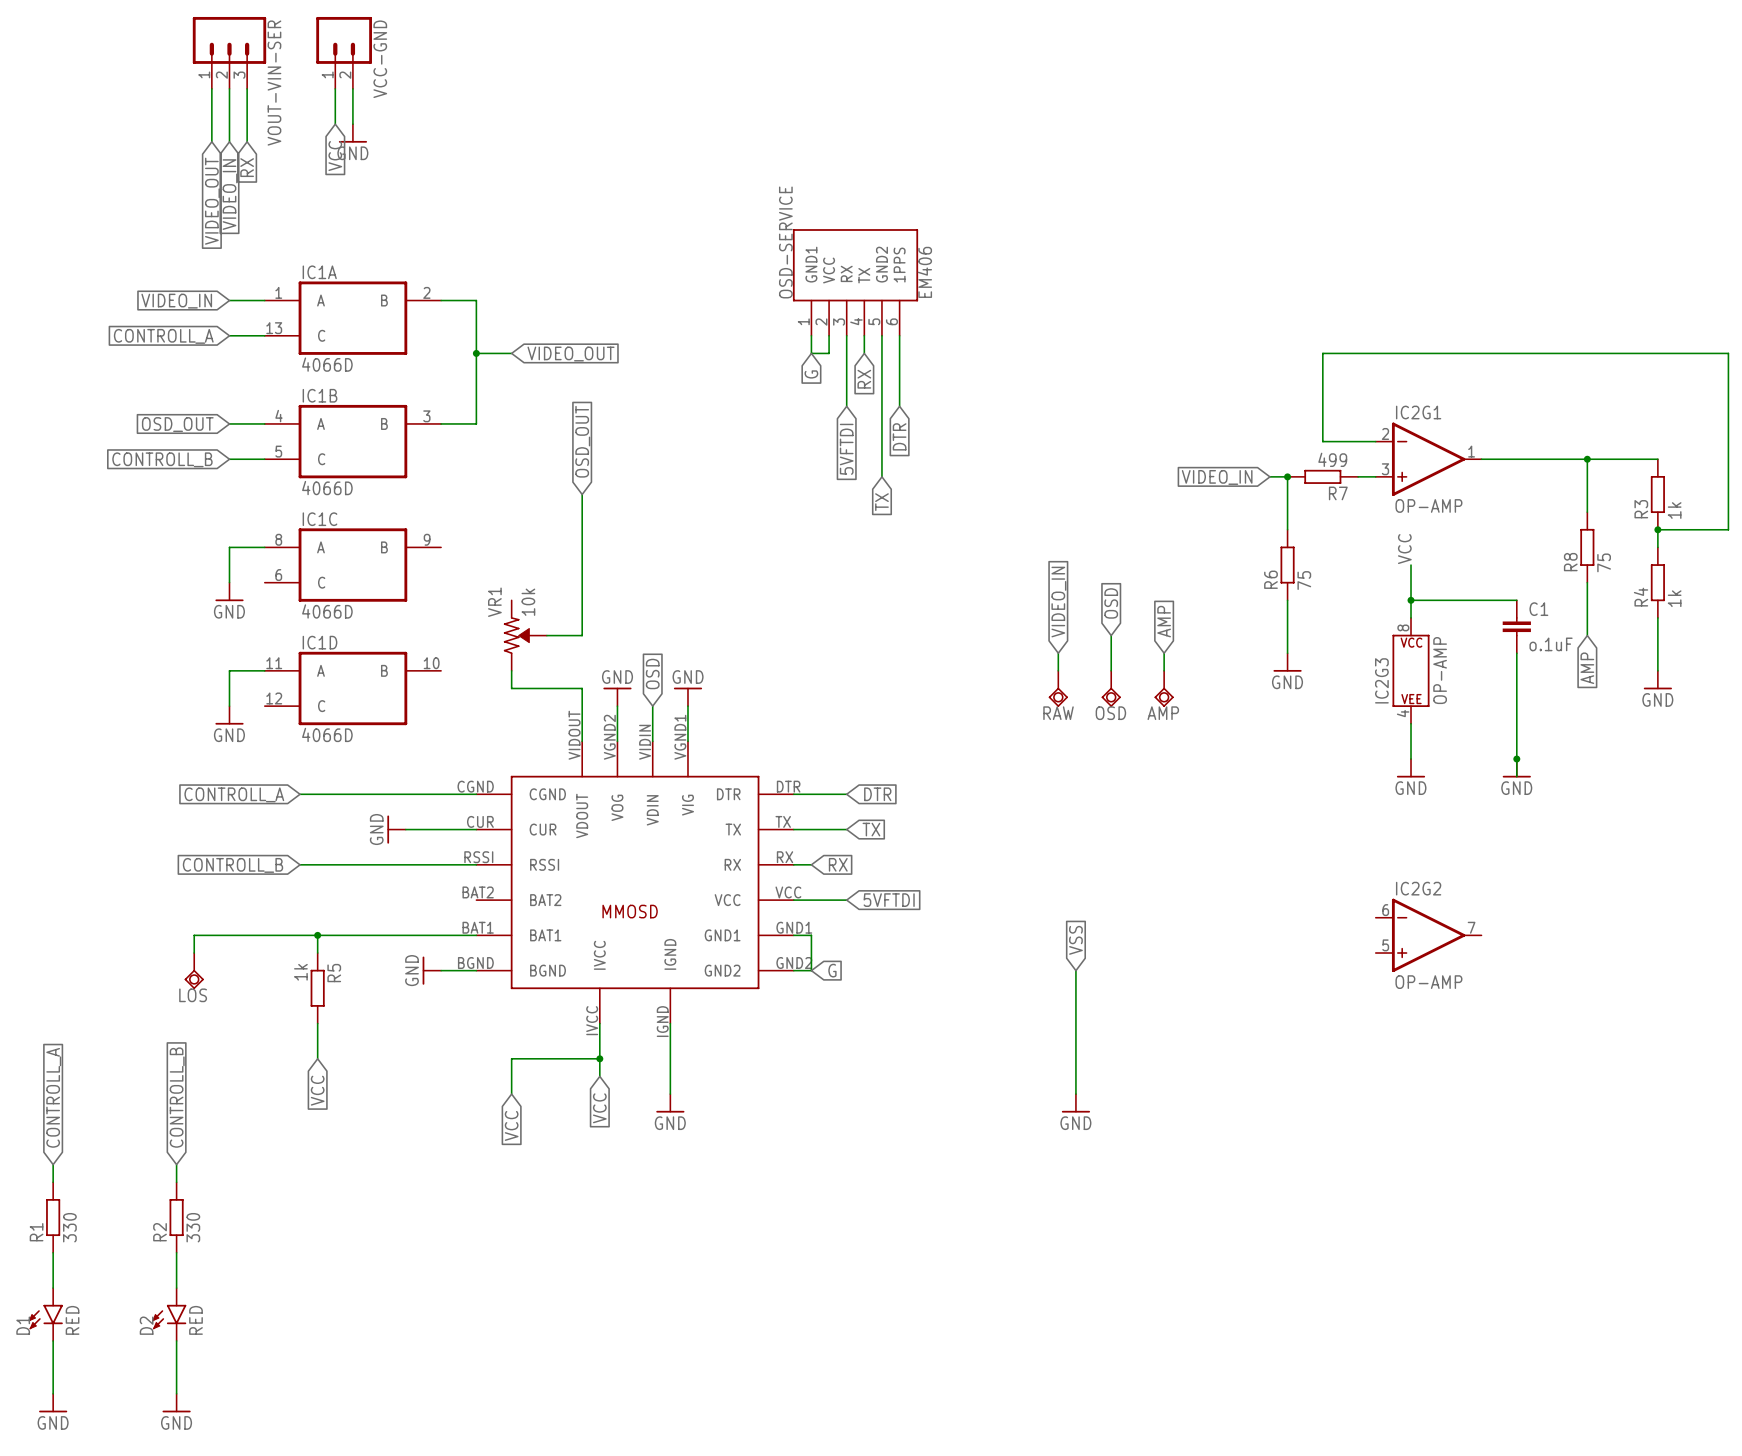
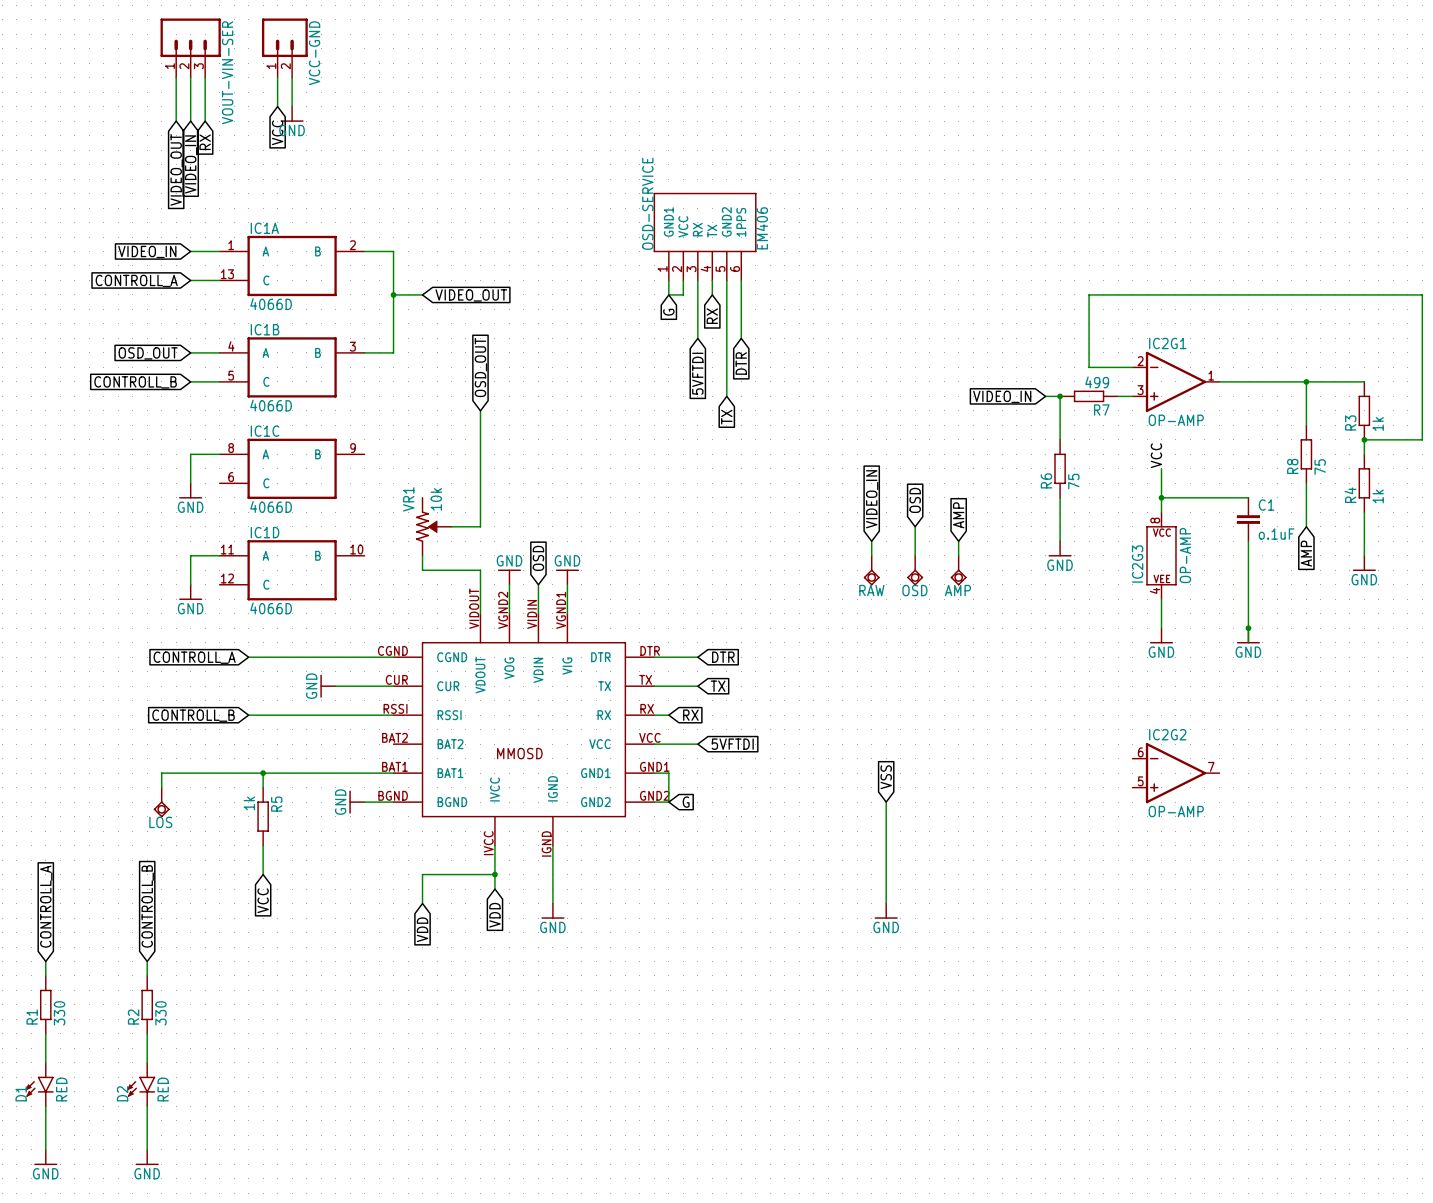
global label: VCC (599, 1108) -> VDD (494, 915)
global label: VCC (511, 1125) -> VDD (422, 929)

